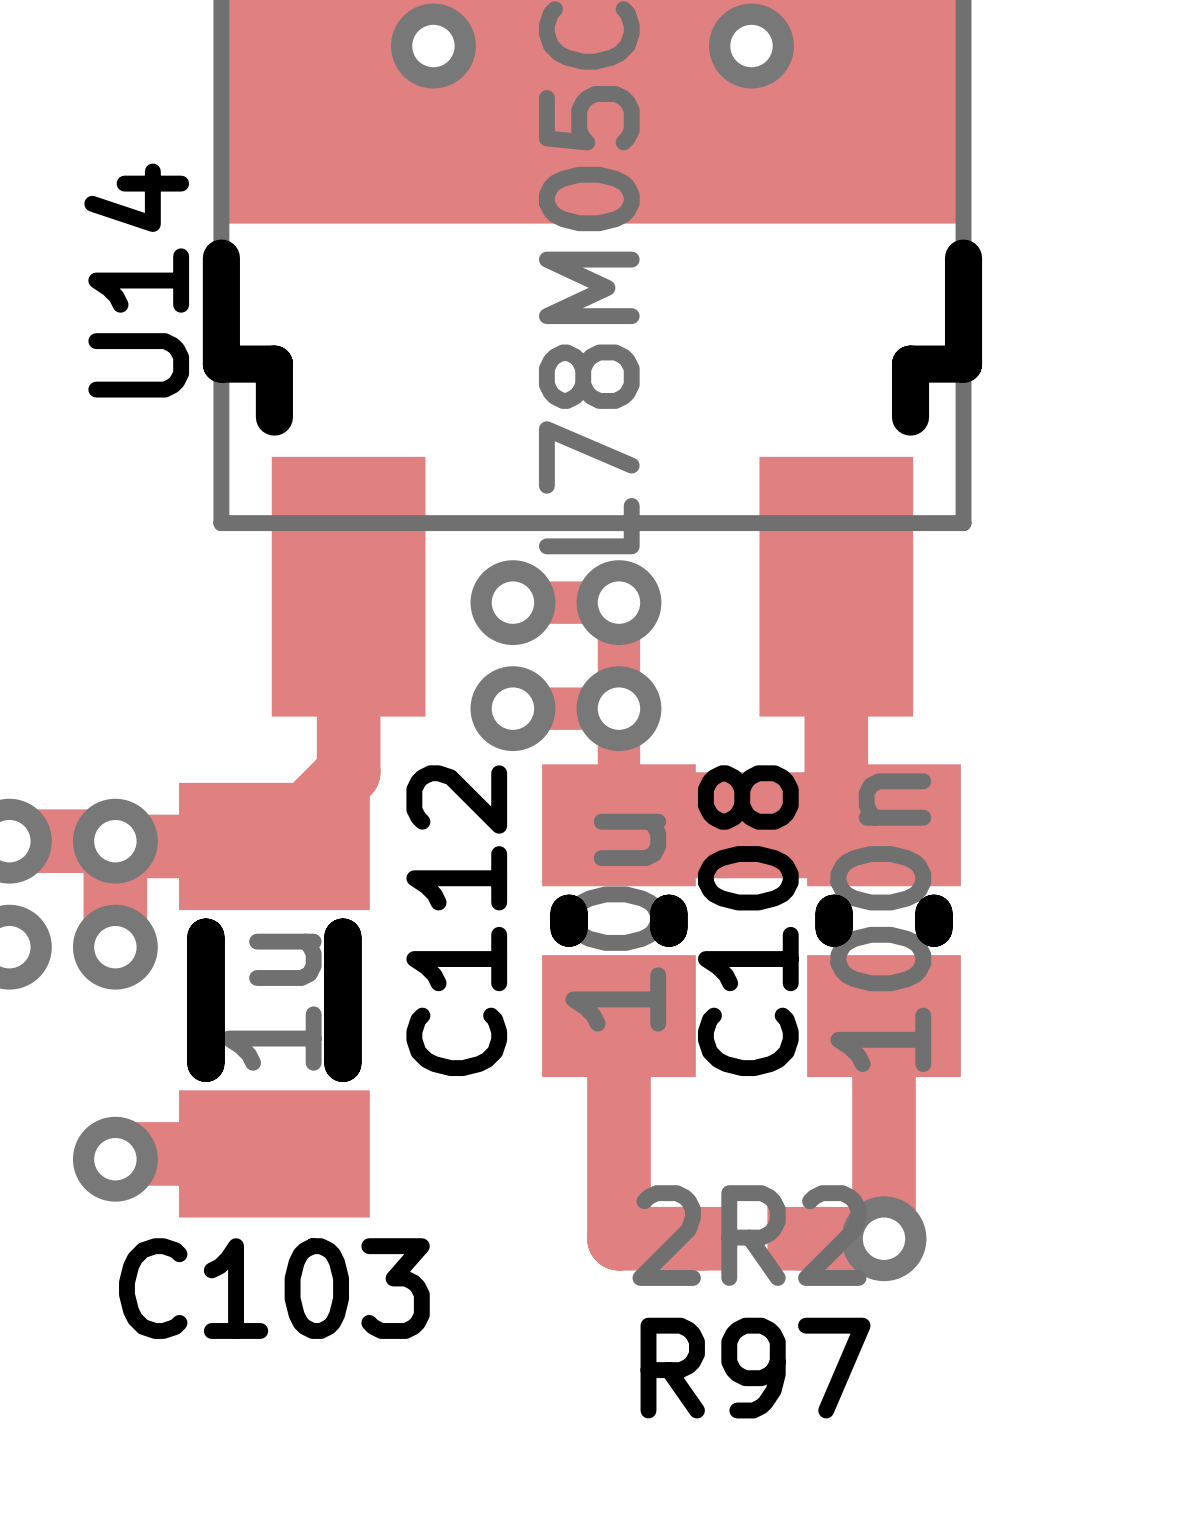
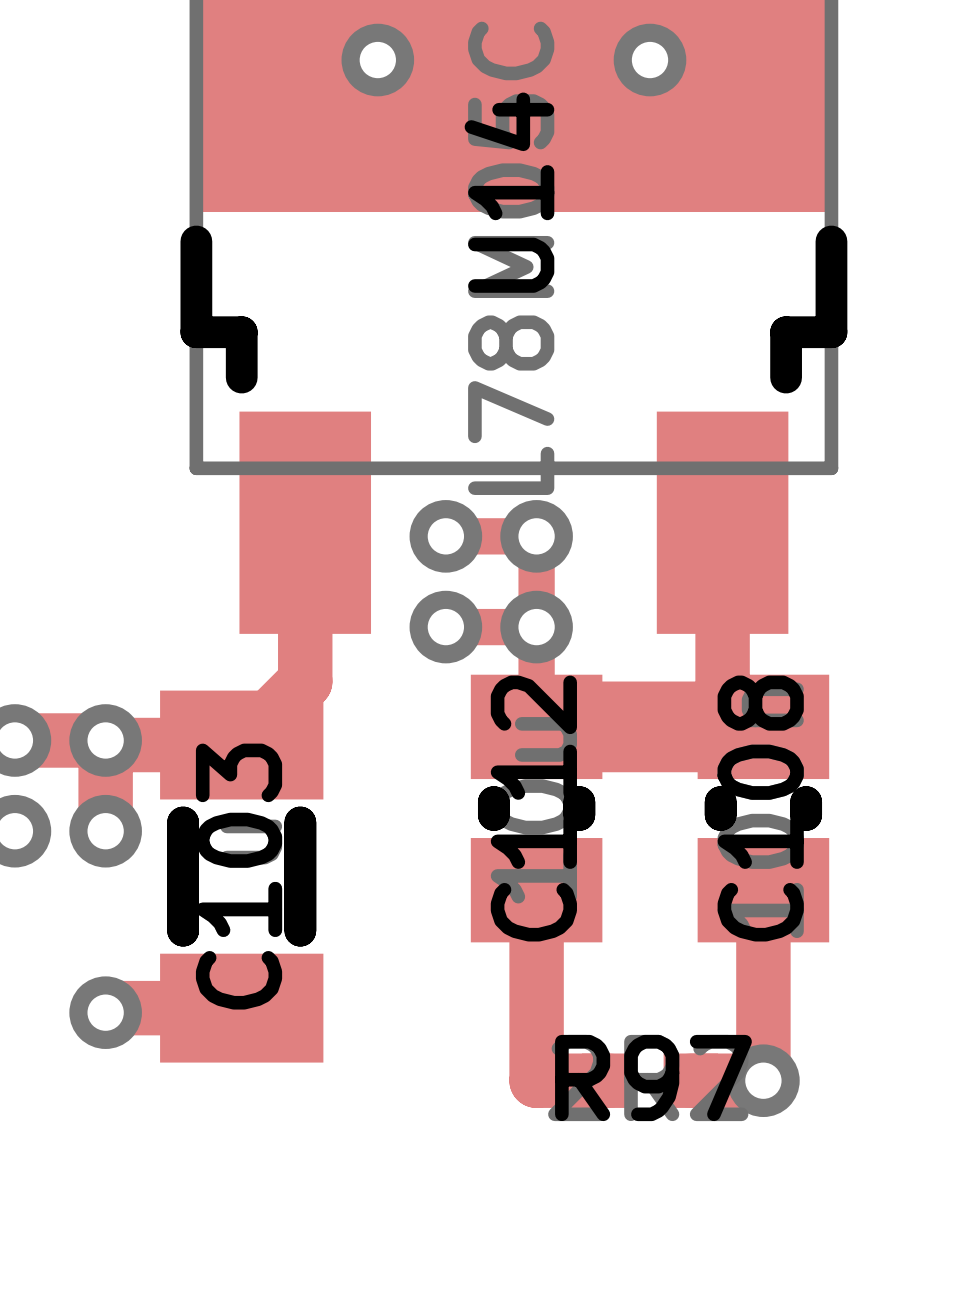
U14 name position: U14 (136, 280) -> U14 (509, 192)
C112 name position: C112 (456, 920) -> C112 (533, 808)
C108 name position: C108 (748, 920) -> C108 (760, 808)
C103 name rotation: 0° (274, 1288) -> 90° counterclockwise (239, 876)
R97 name position: R97 (755, 1368) -> R97 (653, 1078)

